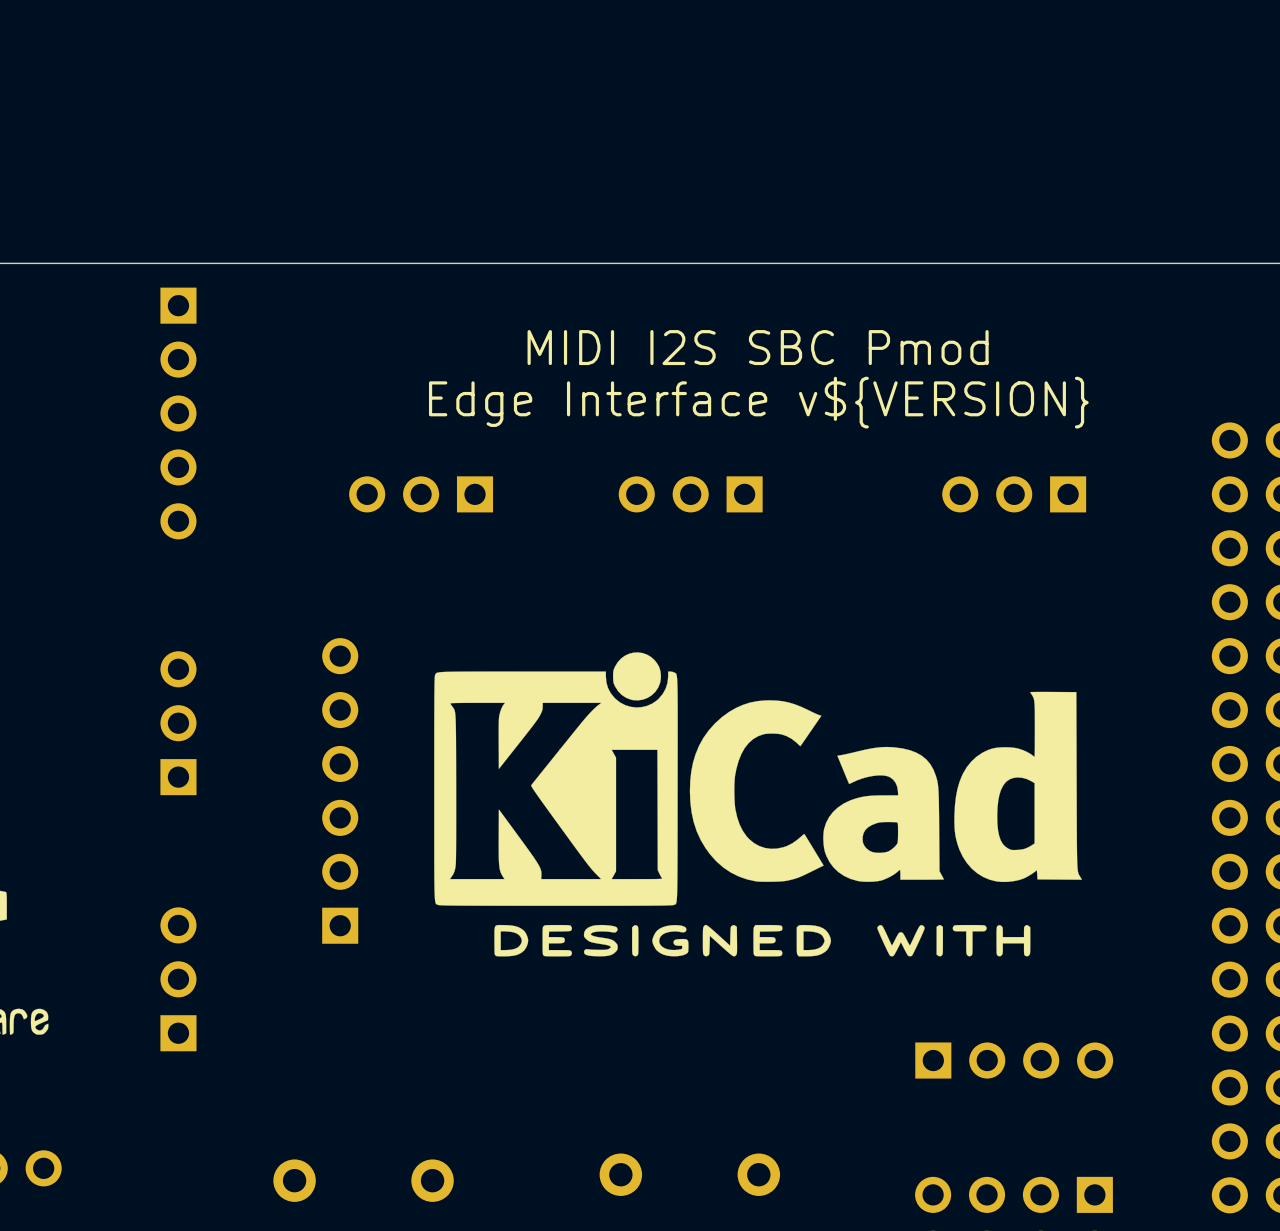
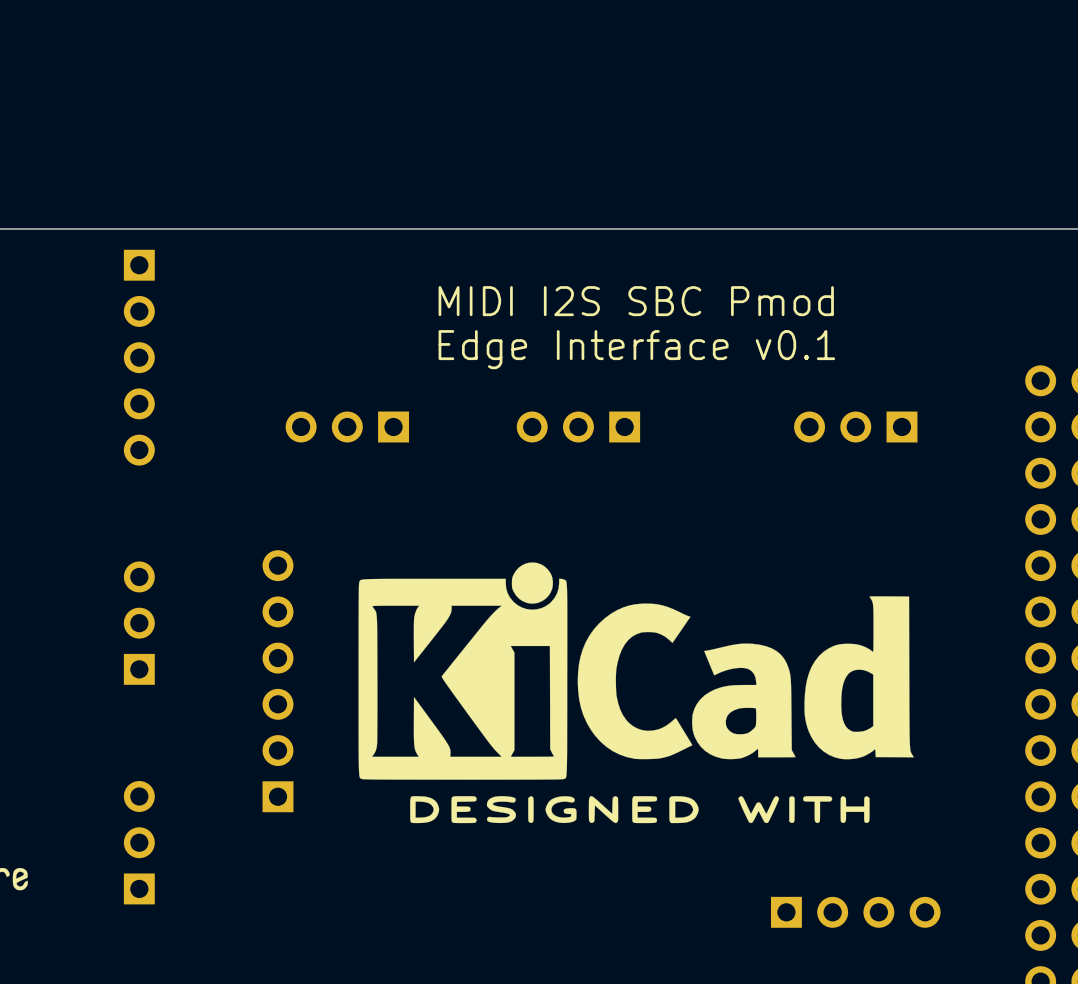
text: Edge Interface v${VERSION} (758, 402) -> Edge Interface v0.1 (636, 349)

